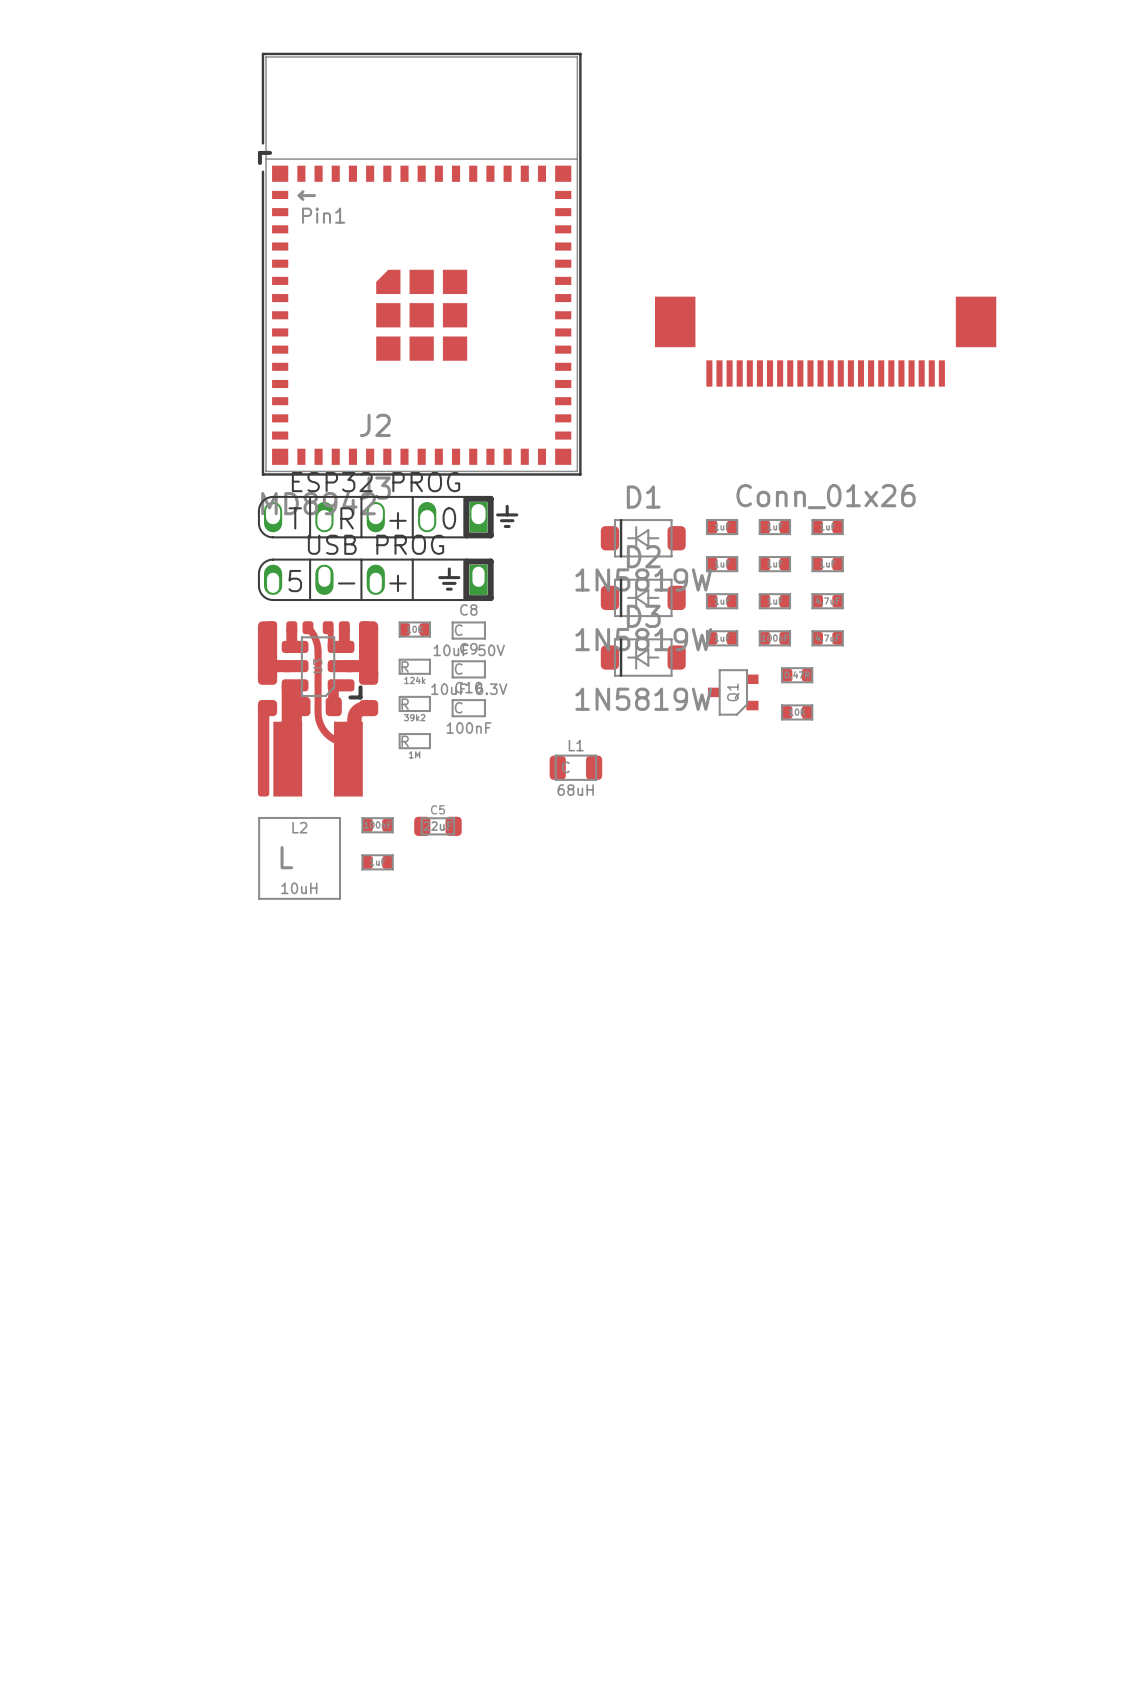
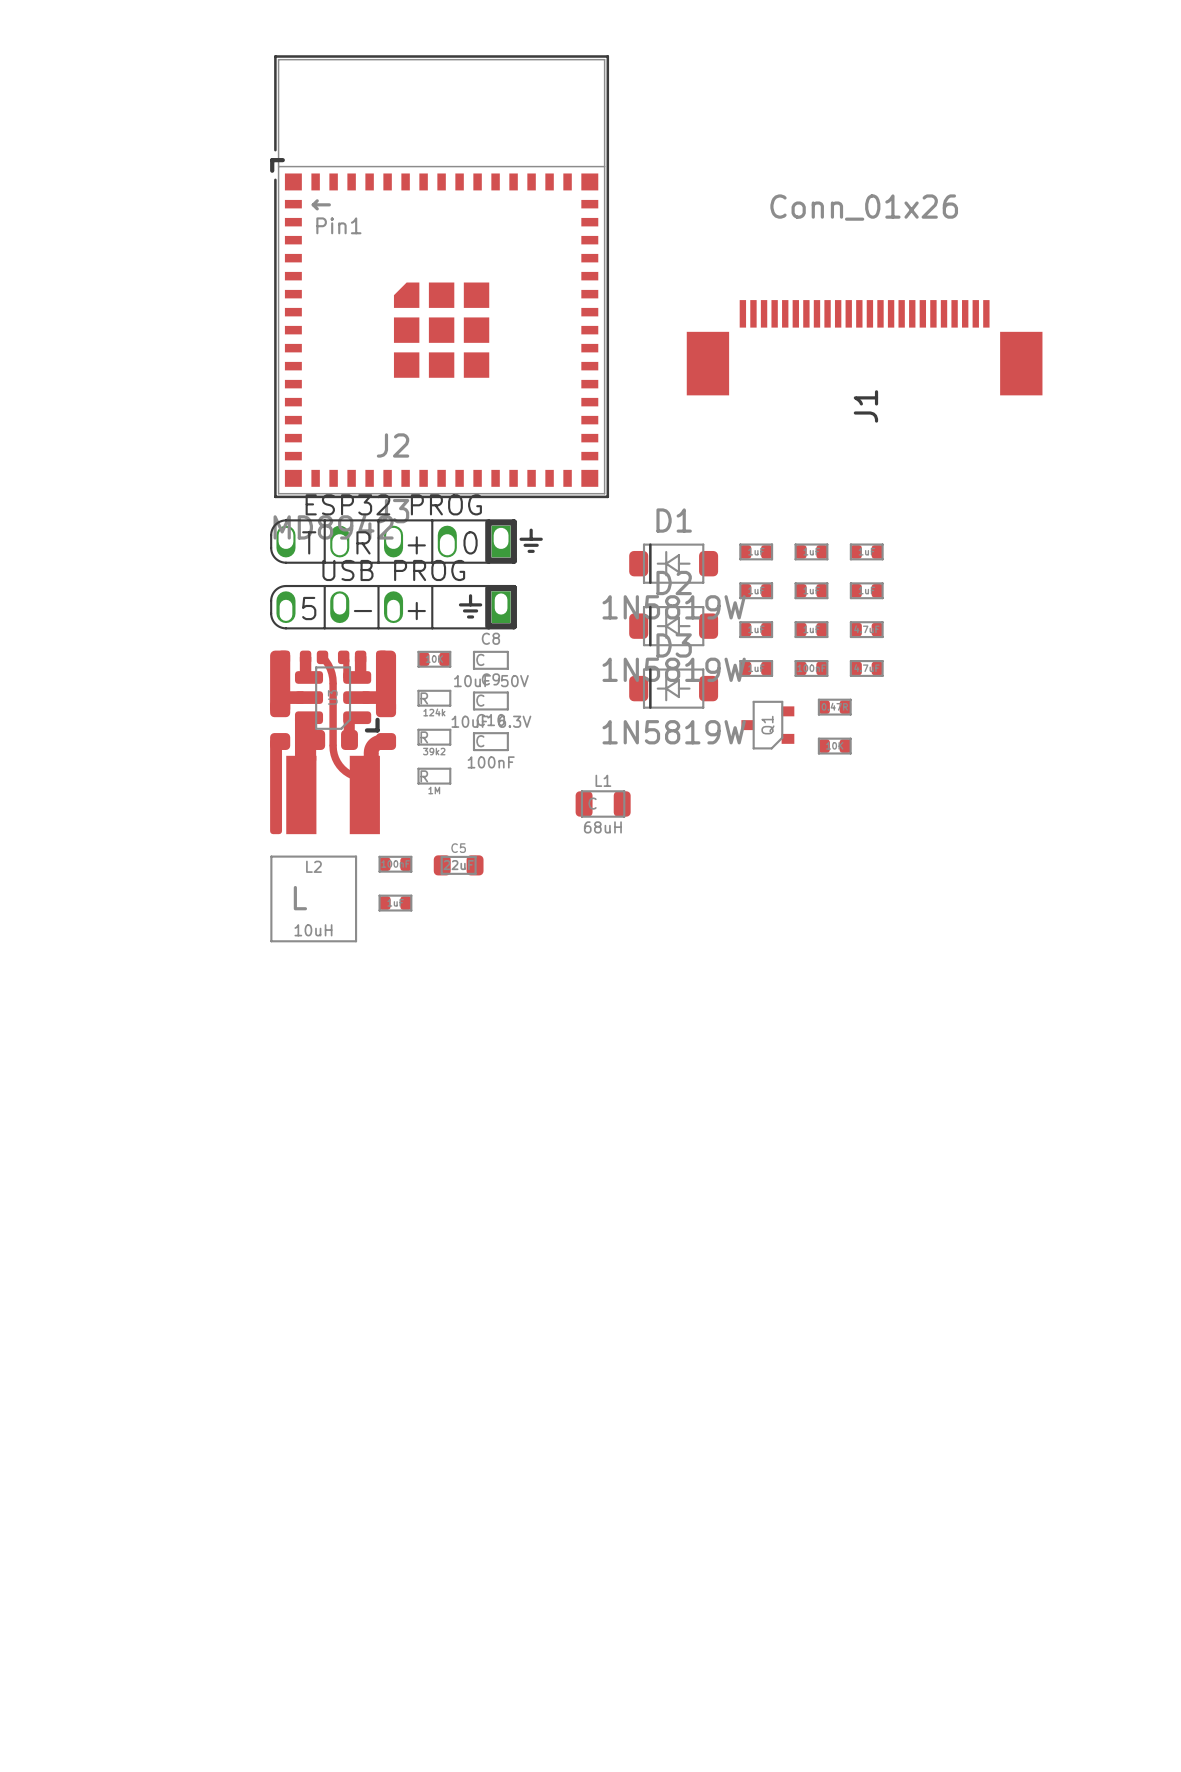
J1: none -> Conn_01x26 (864, 347)
part: Conn_01x26 (825, 341) -> none

